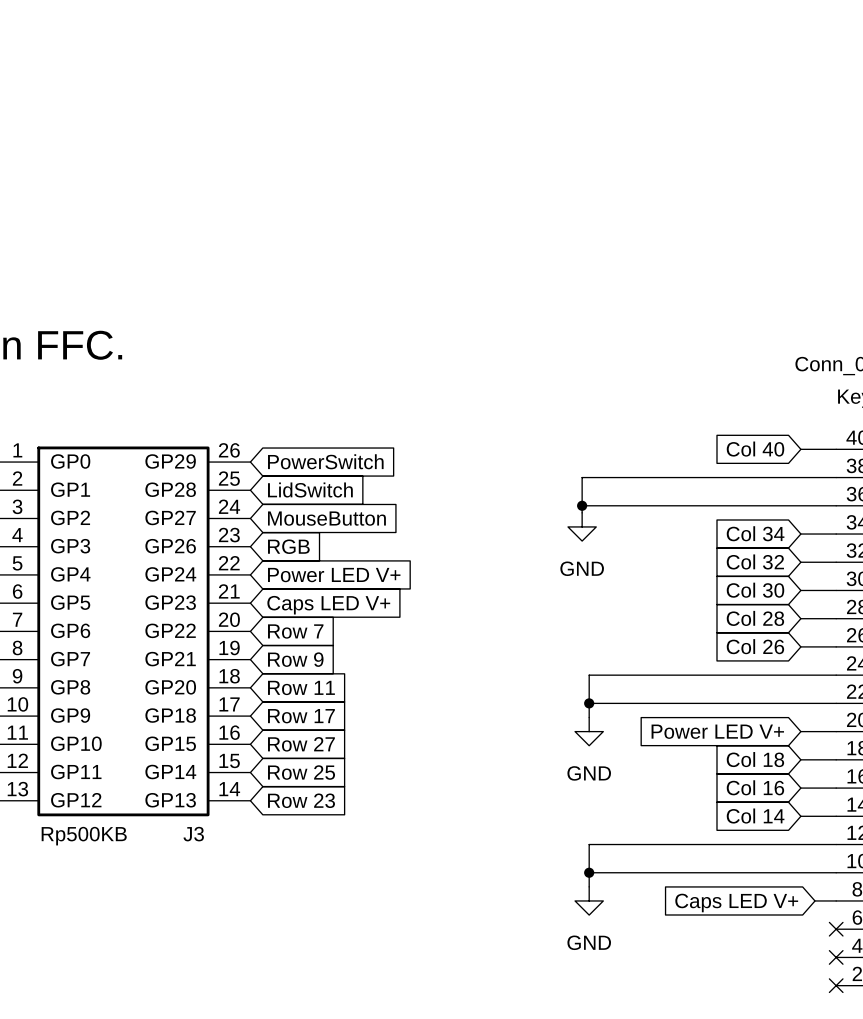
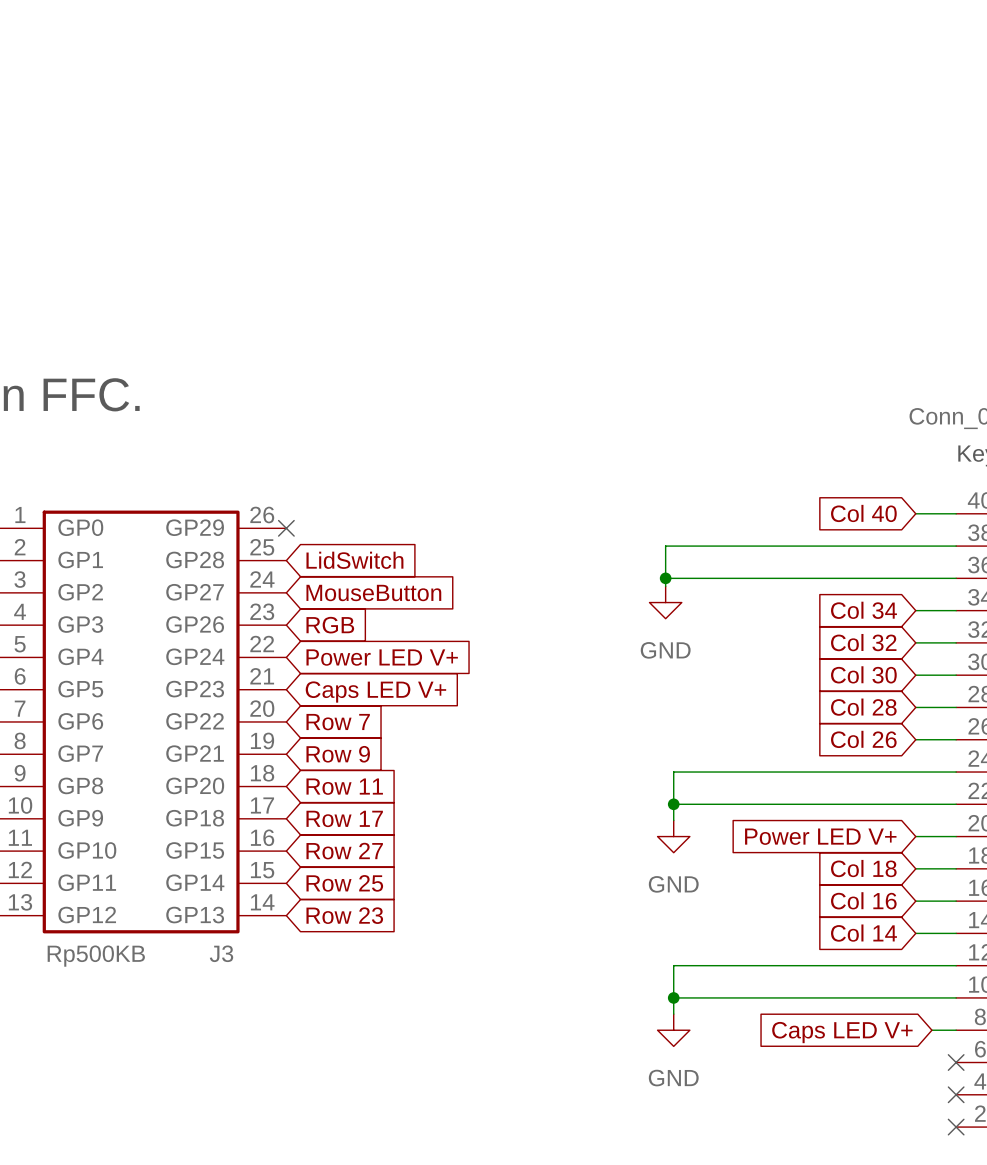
global label: PowerSwitch (325, 461) -> none
no-connect mark: none -> (286, 528)

